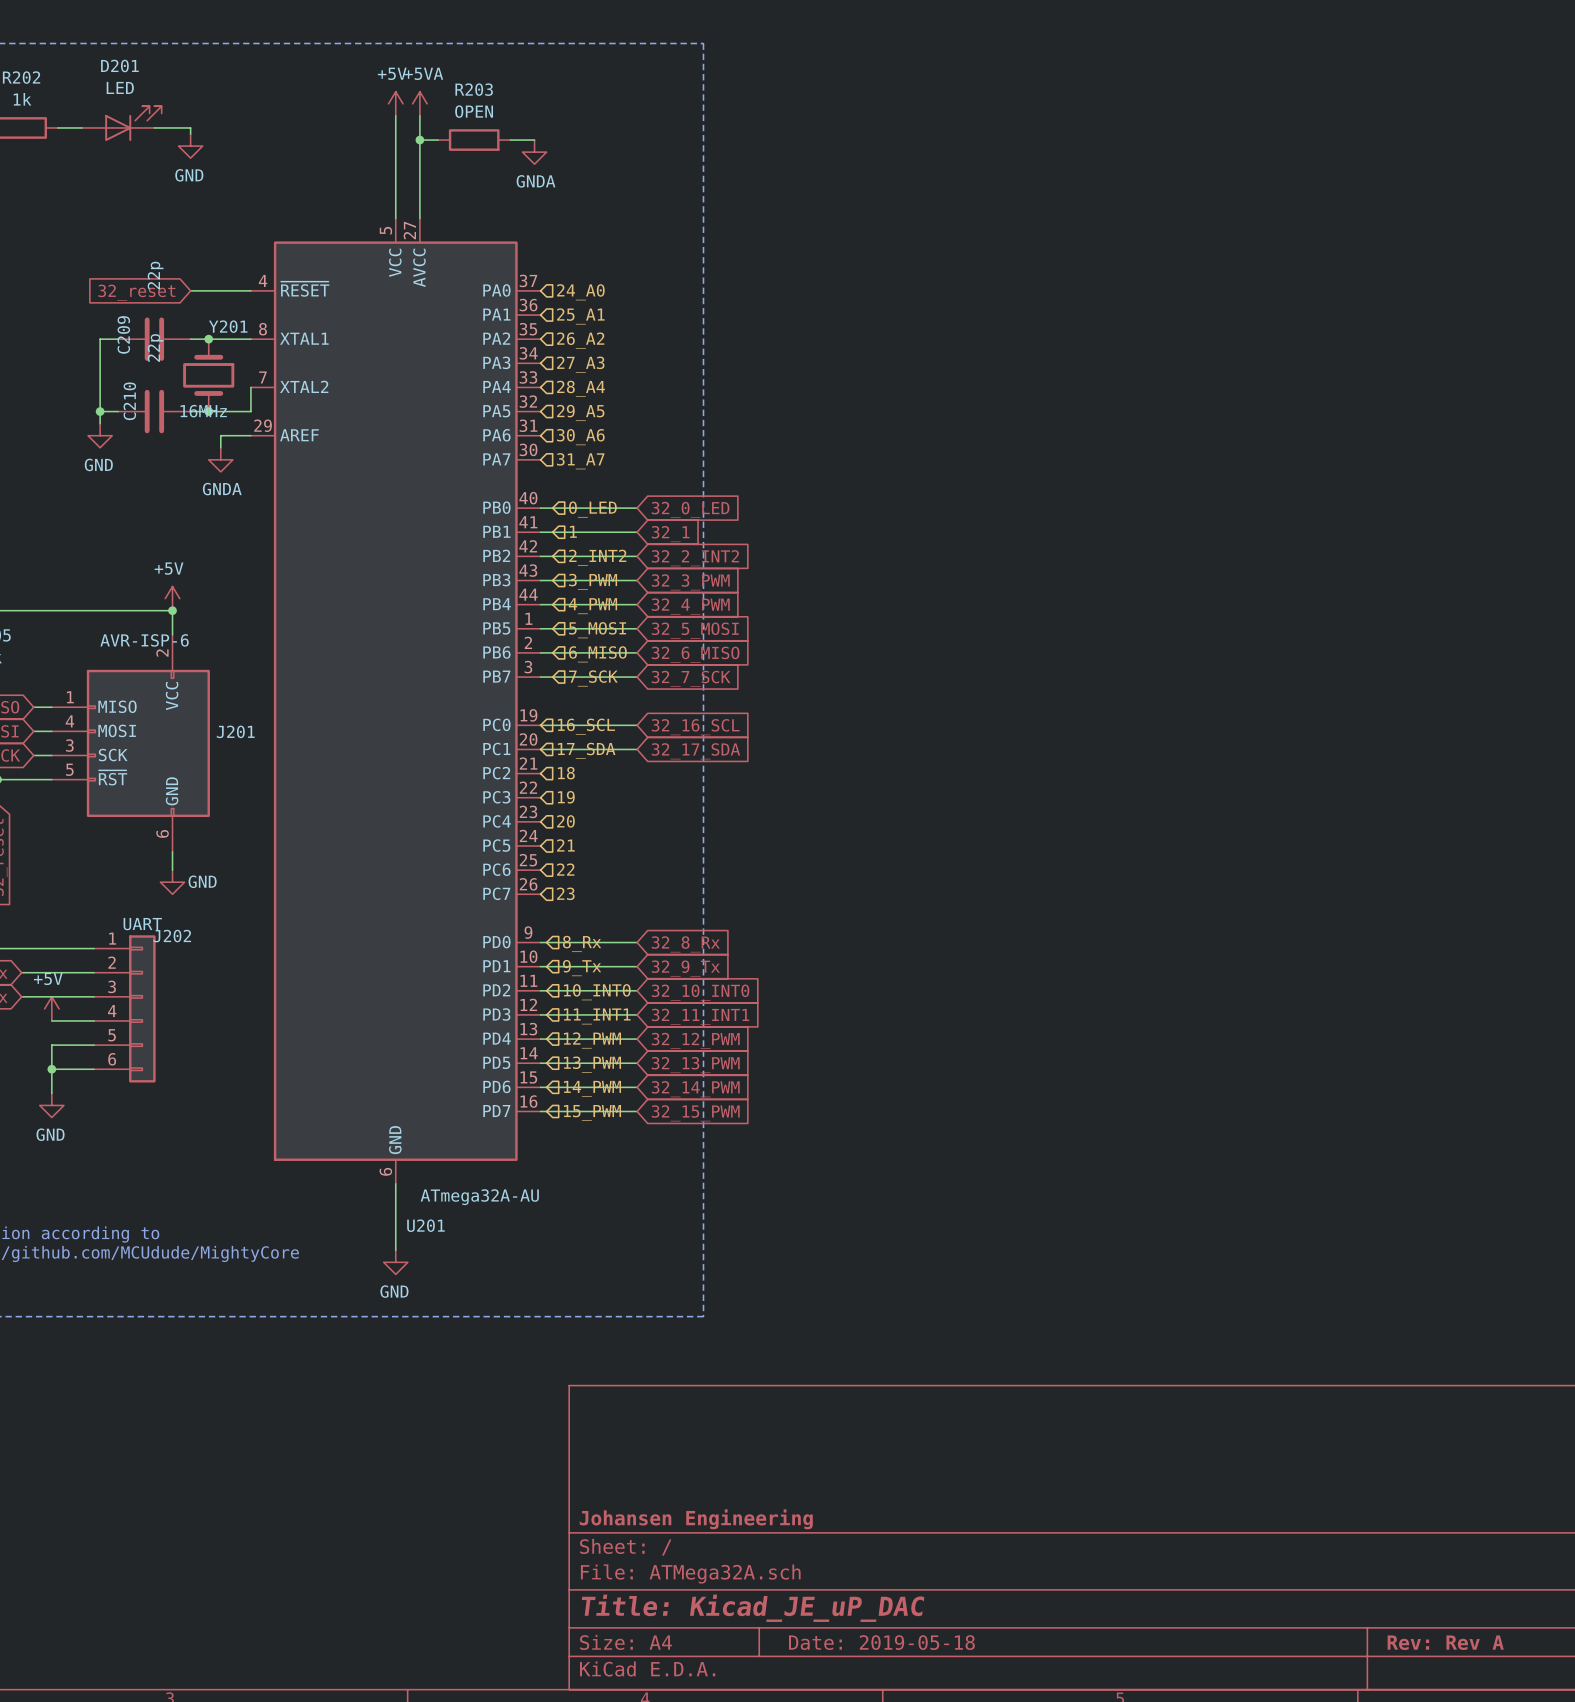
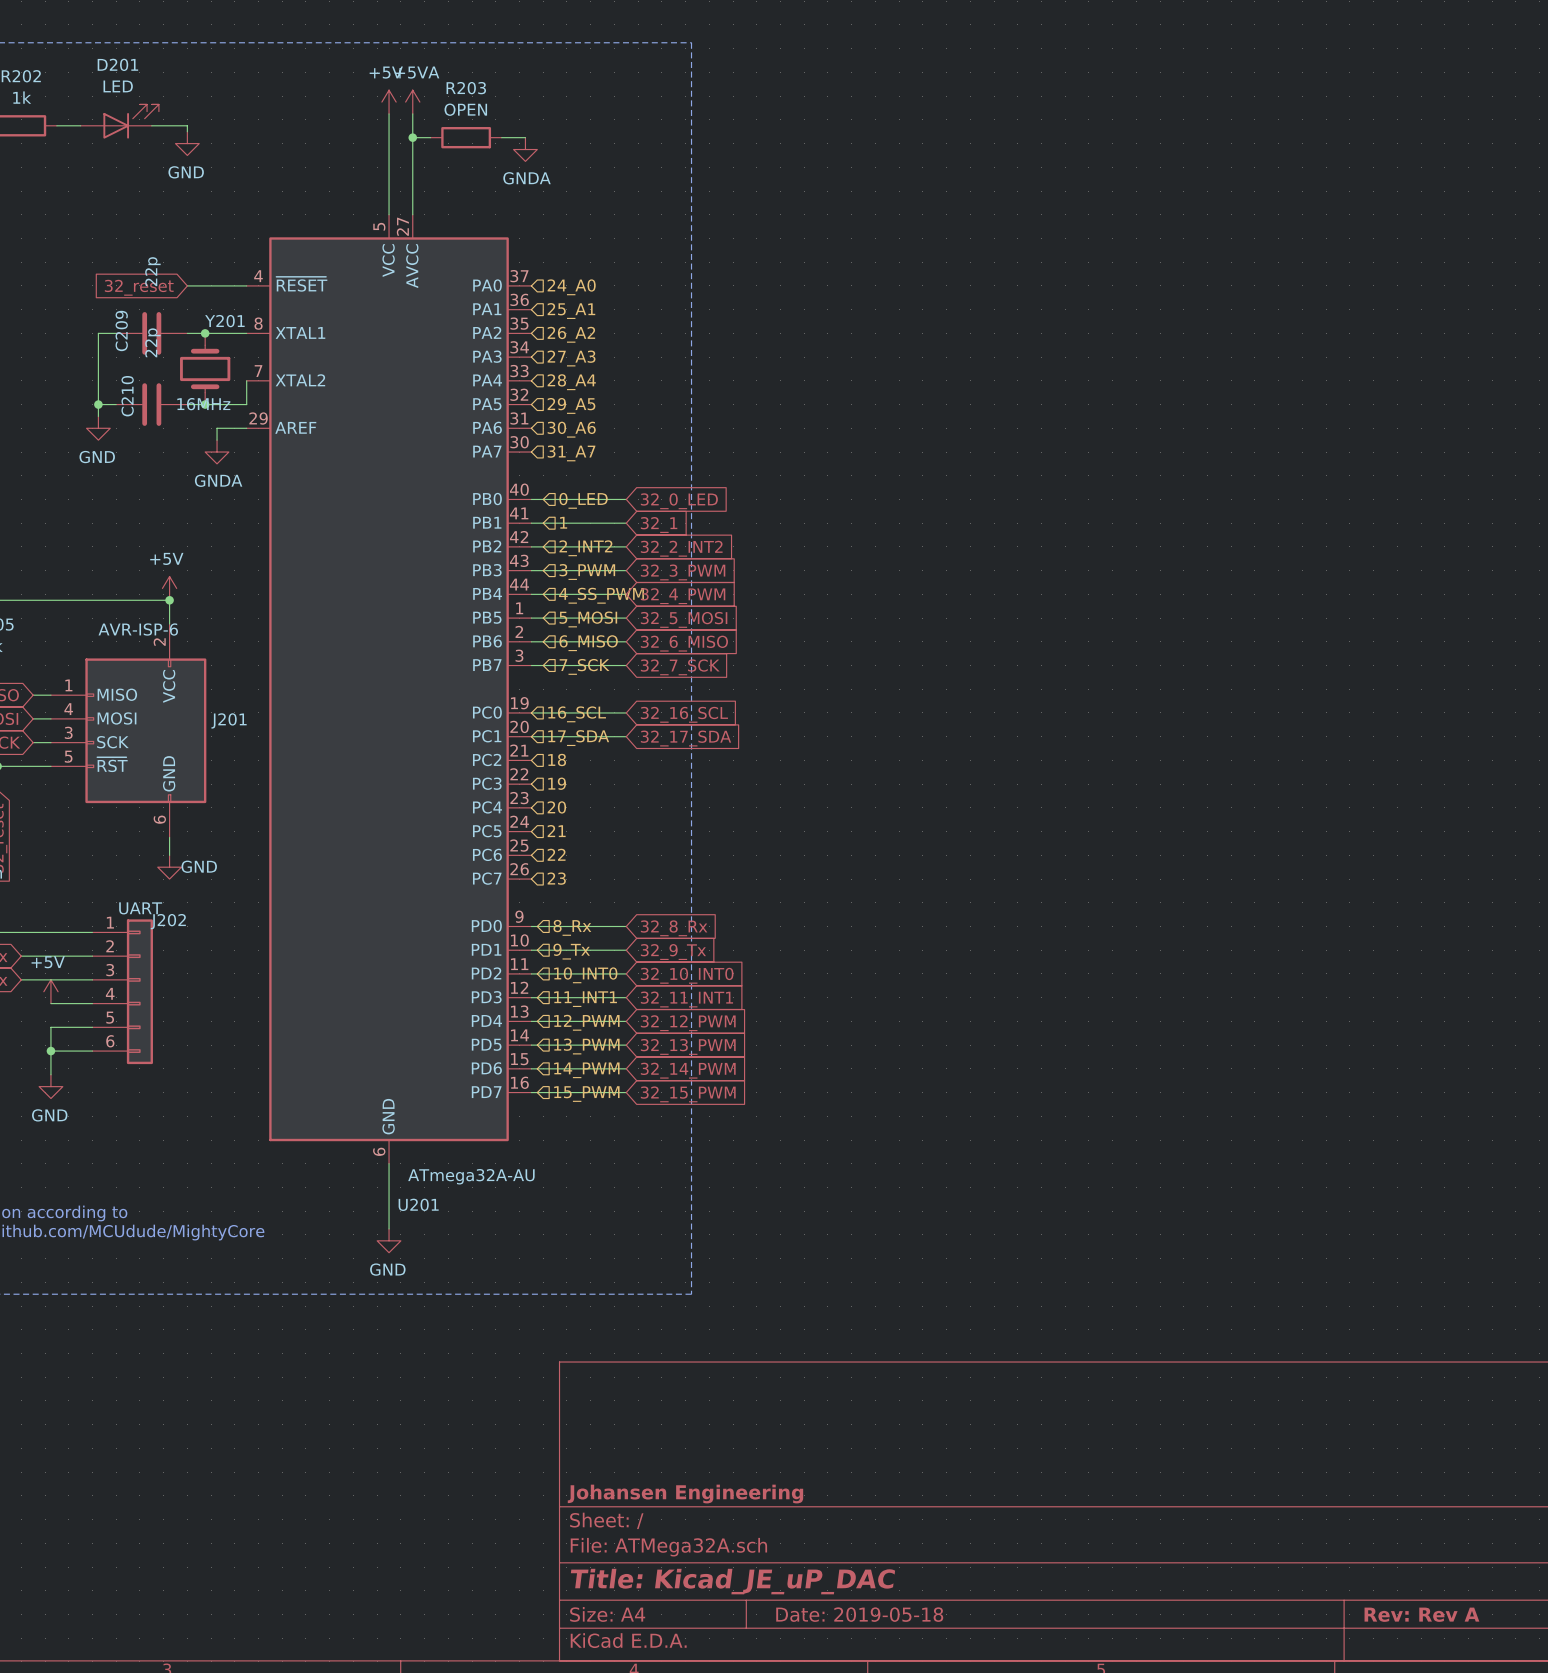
hierarchical label: 4_PWM (592, 606) -> 4_SS_PWM (601, 595)

